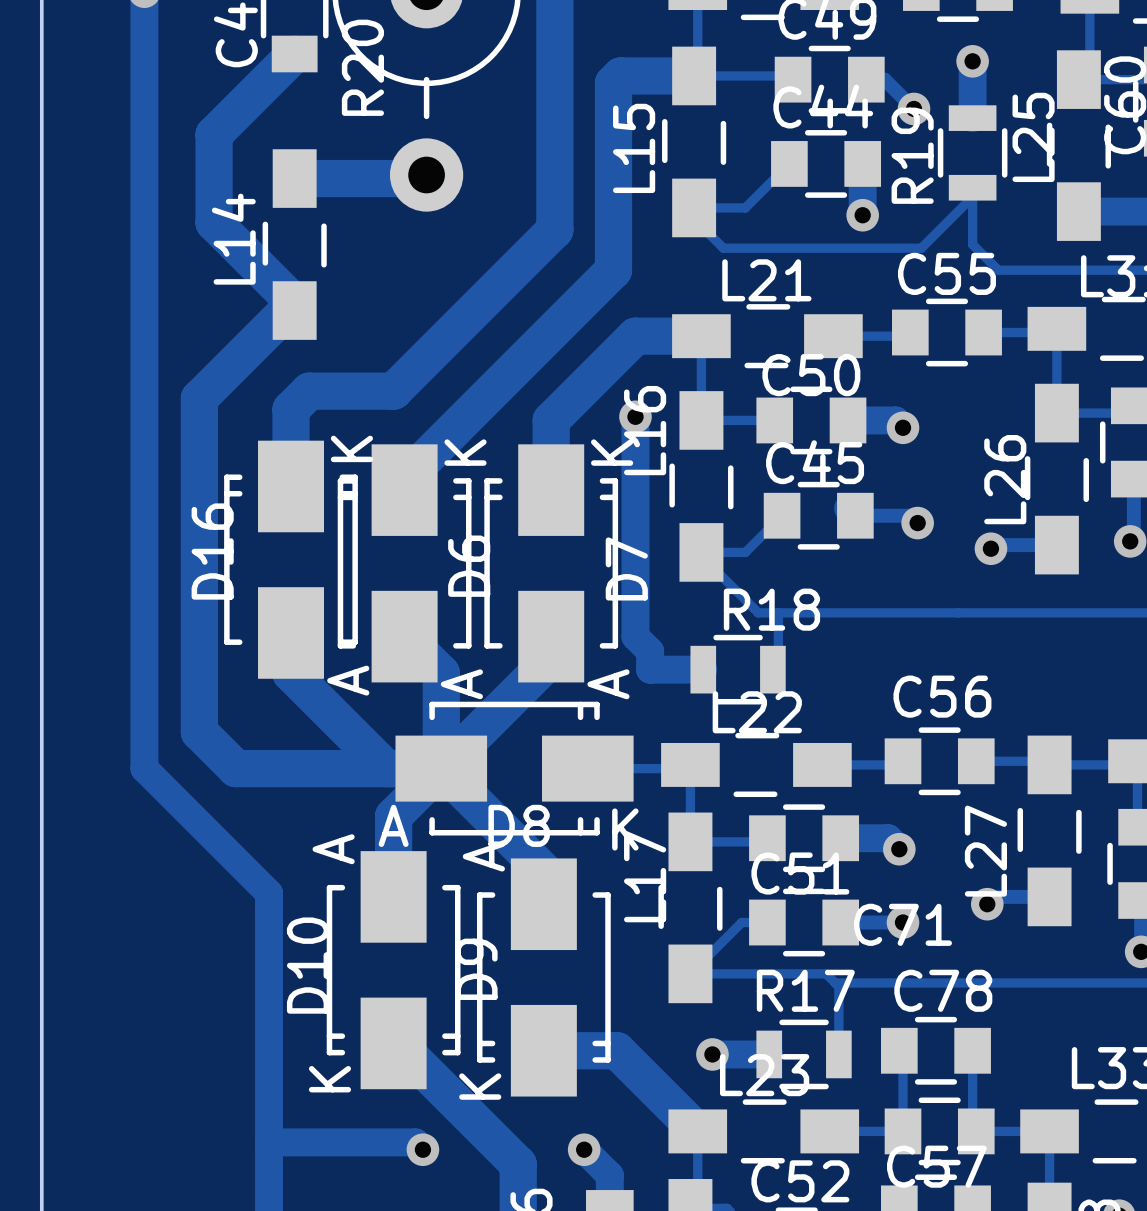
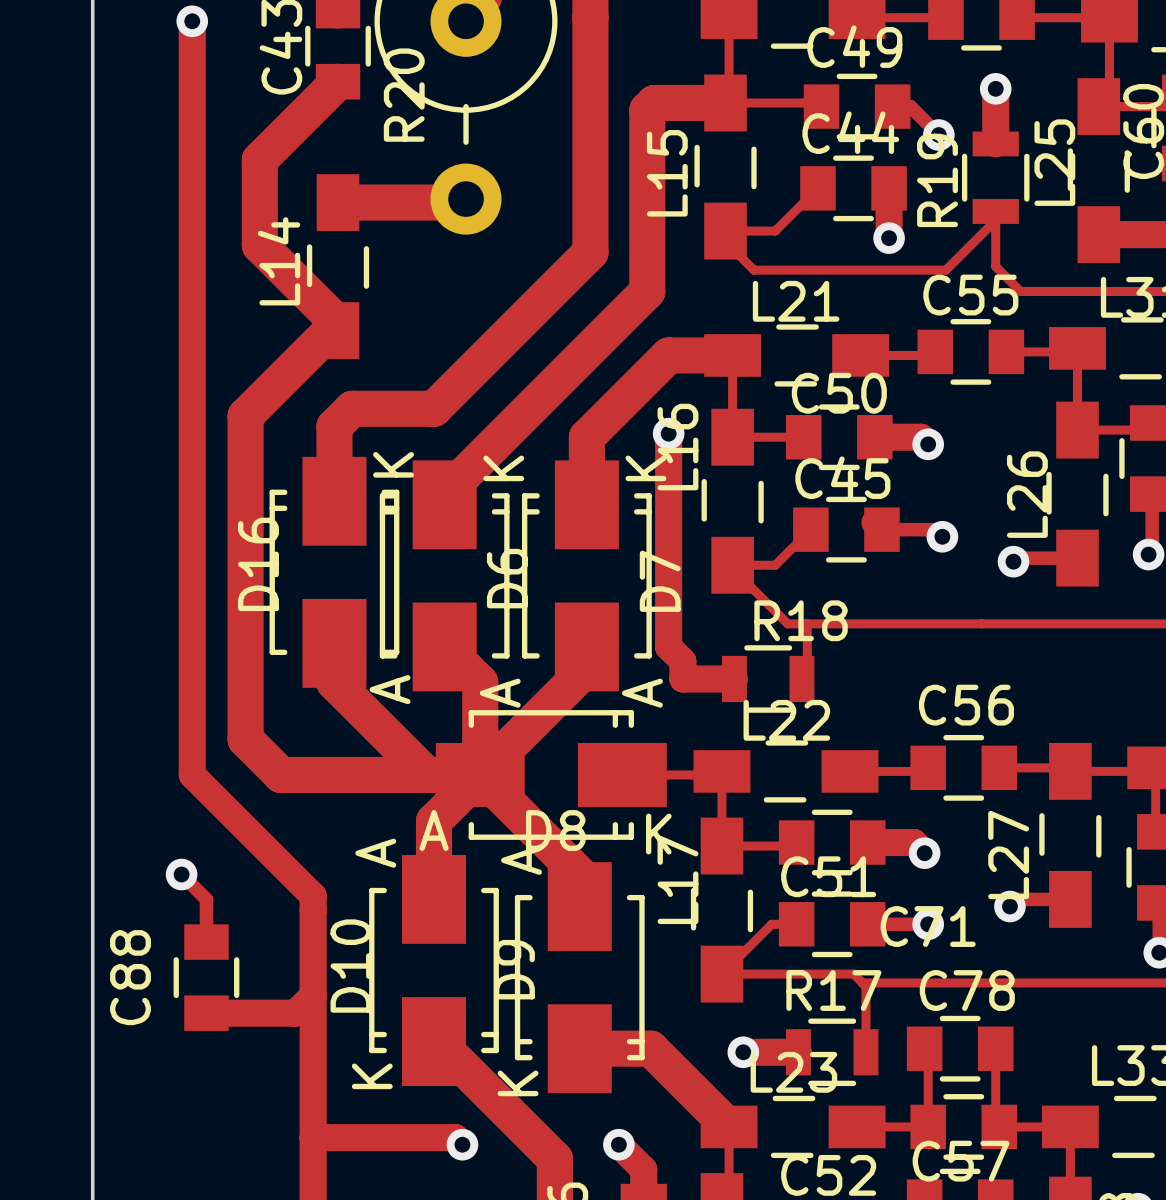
track: none -> (181, 874) (206, 899) (206, 942)
via: none -> (181, 874)
C88: none -> (206, 977)
track: none -> (313, 995) (295, 1013) (206, 1013)

